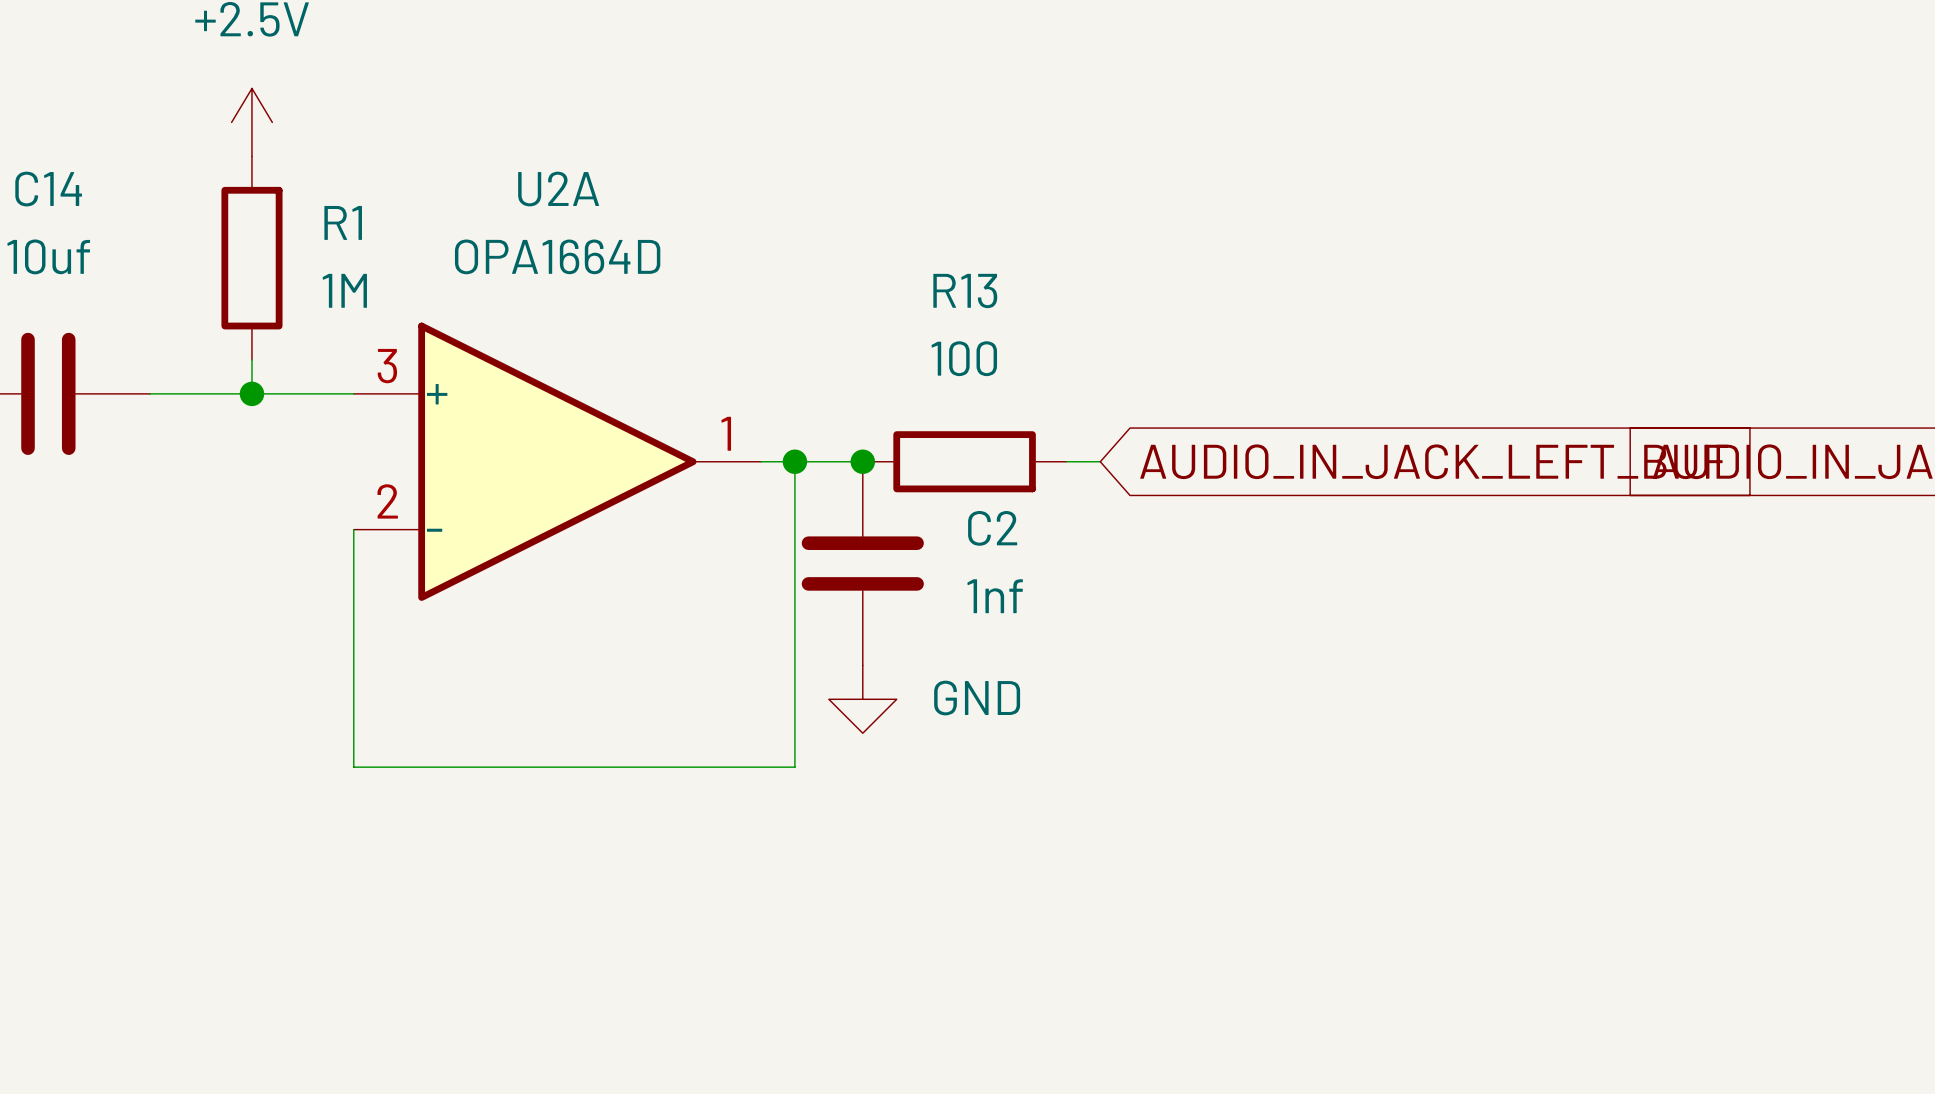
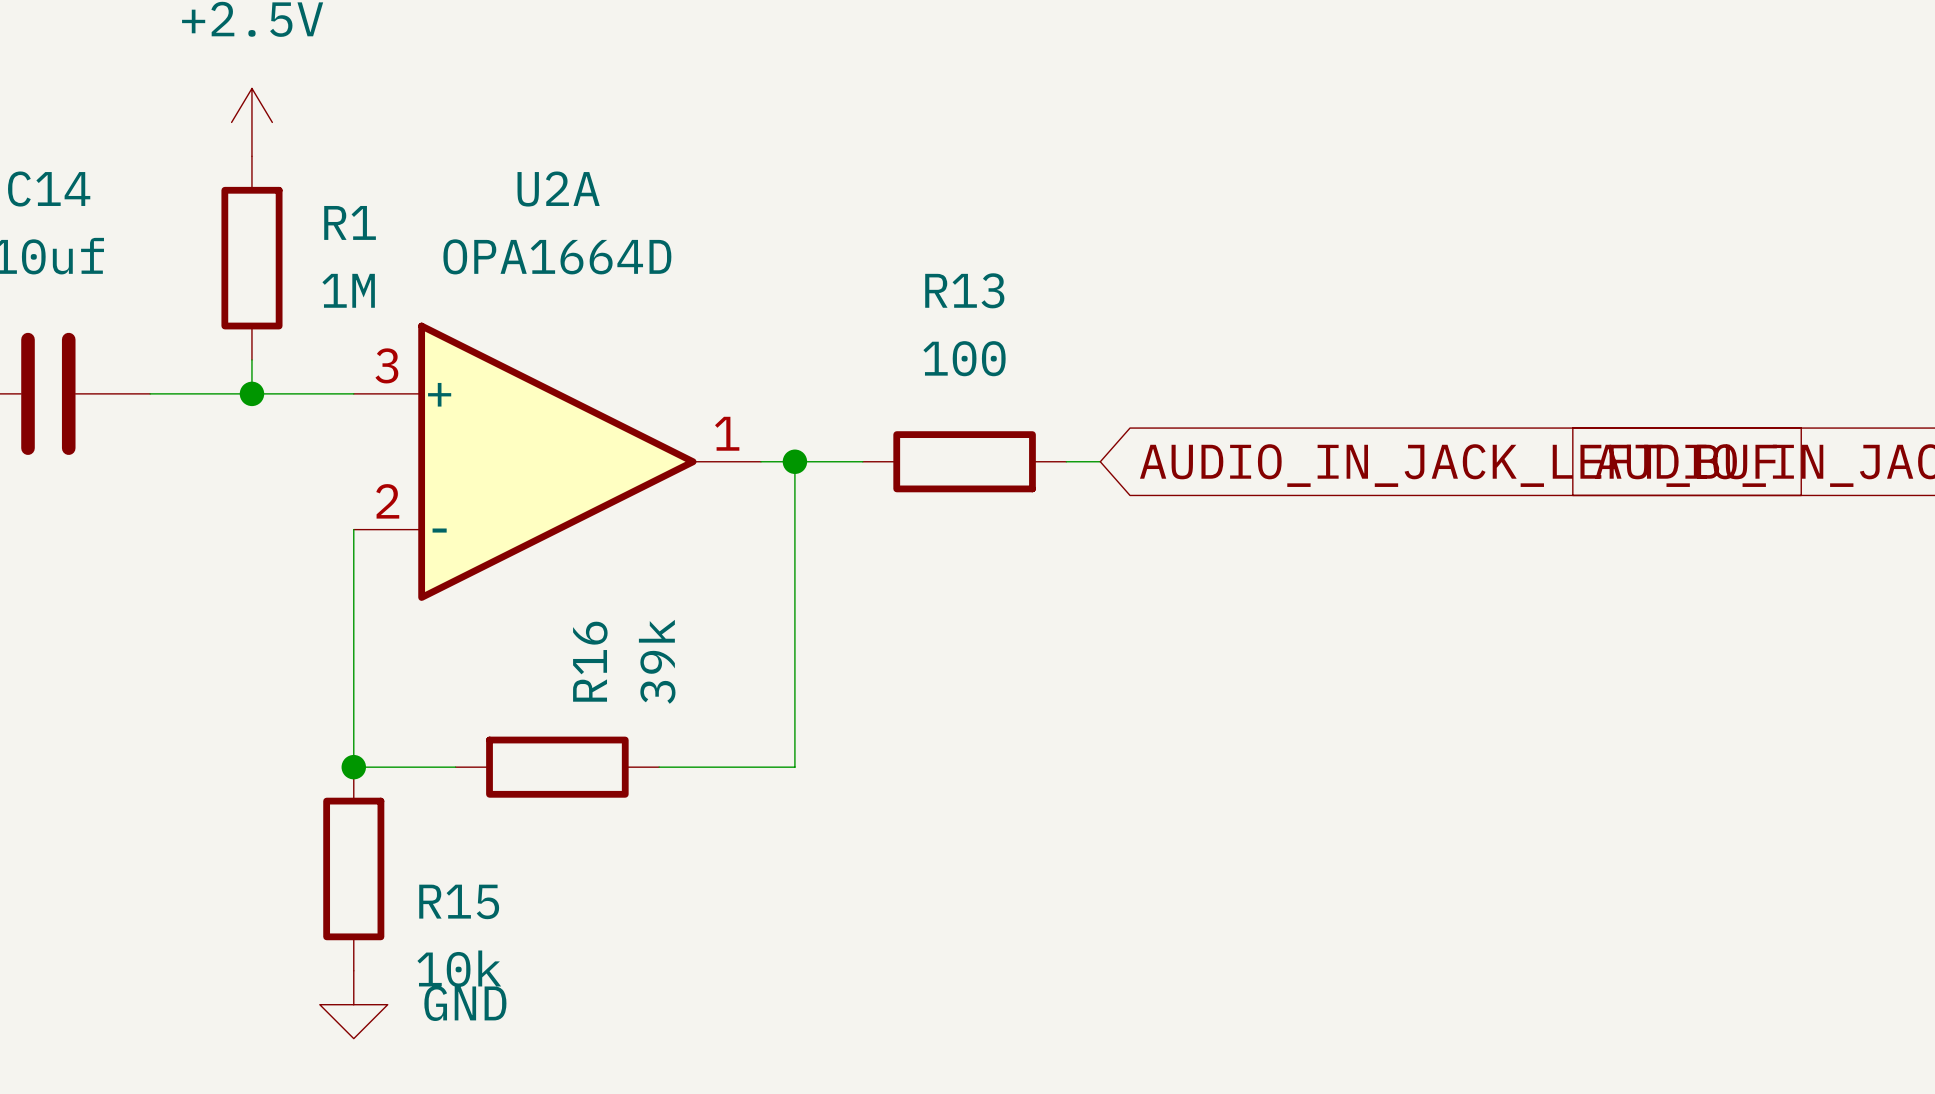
junction: (862, 461) -> none
C2: 1nf (862, 563) -> none
power symbol position: GND (862, 699) -> GND (353, 1004)
junction: none -> (353, 767)
wire: (455, 767) (659, 767) -> none
R16: none -> 39k (557, 767)
R15: none -> 10k (353, 868)

